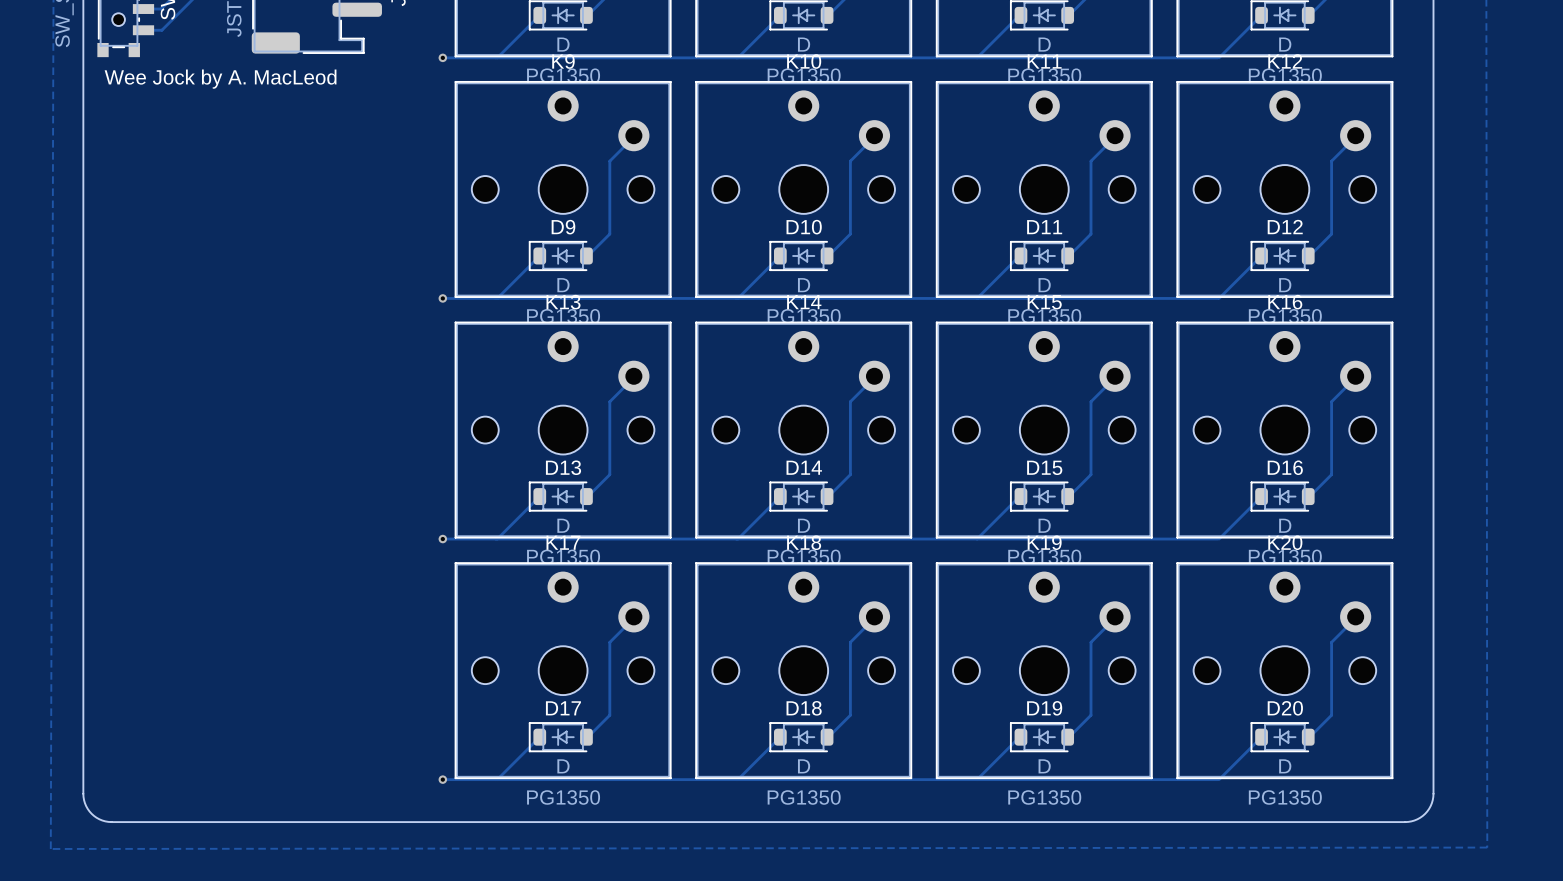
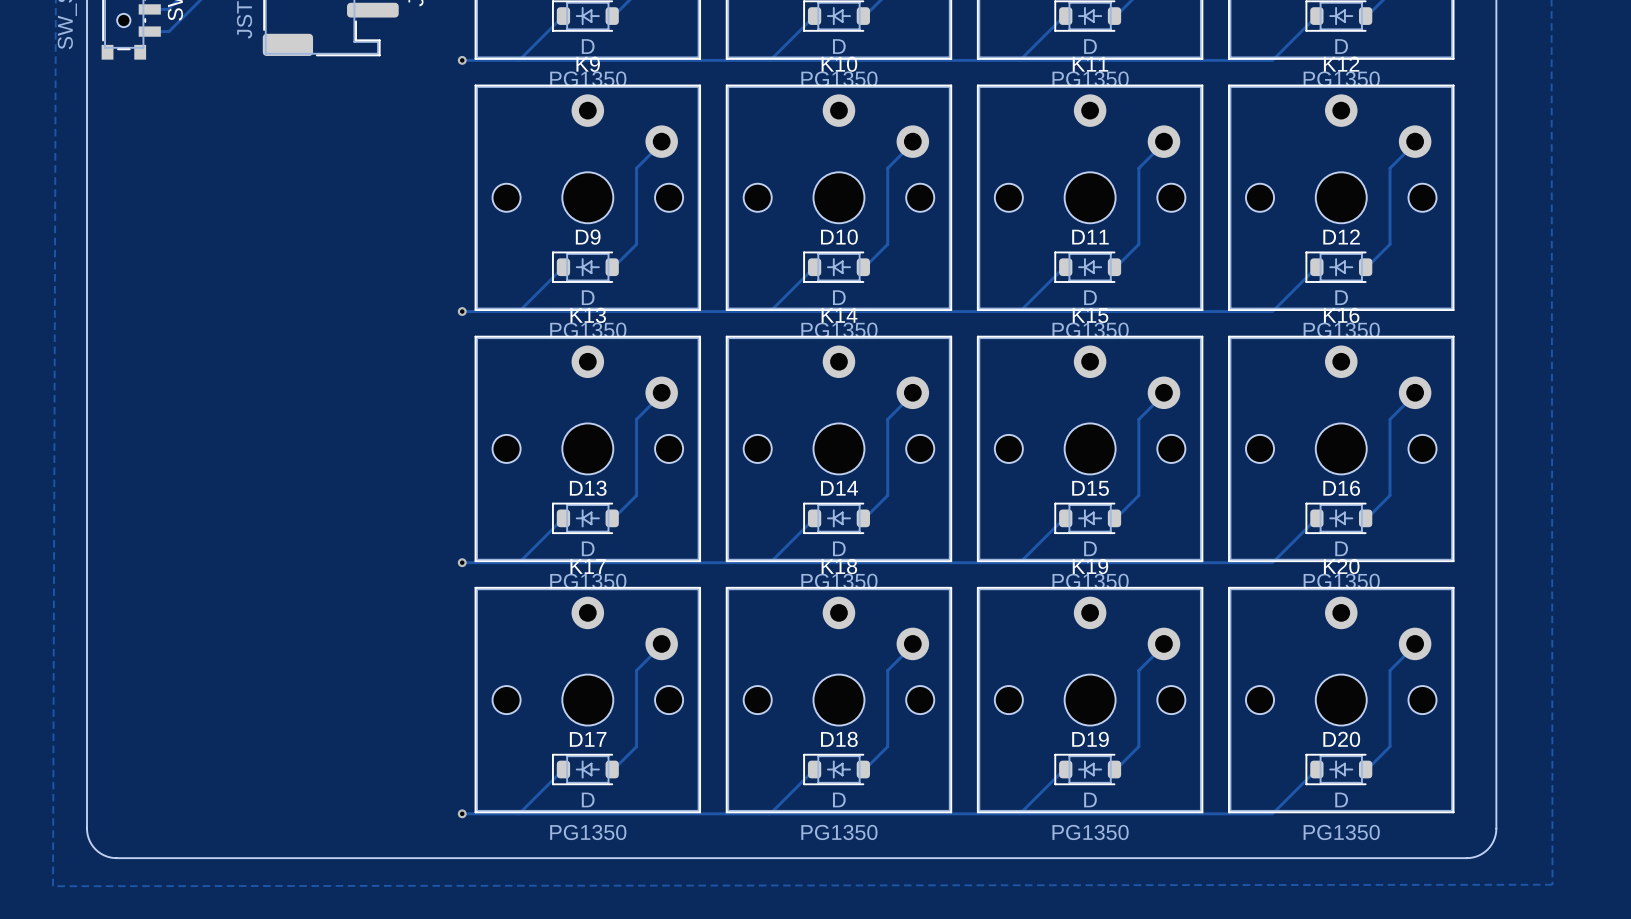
text: Wee Jock by A. MacLeod (220, 79) -> none

